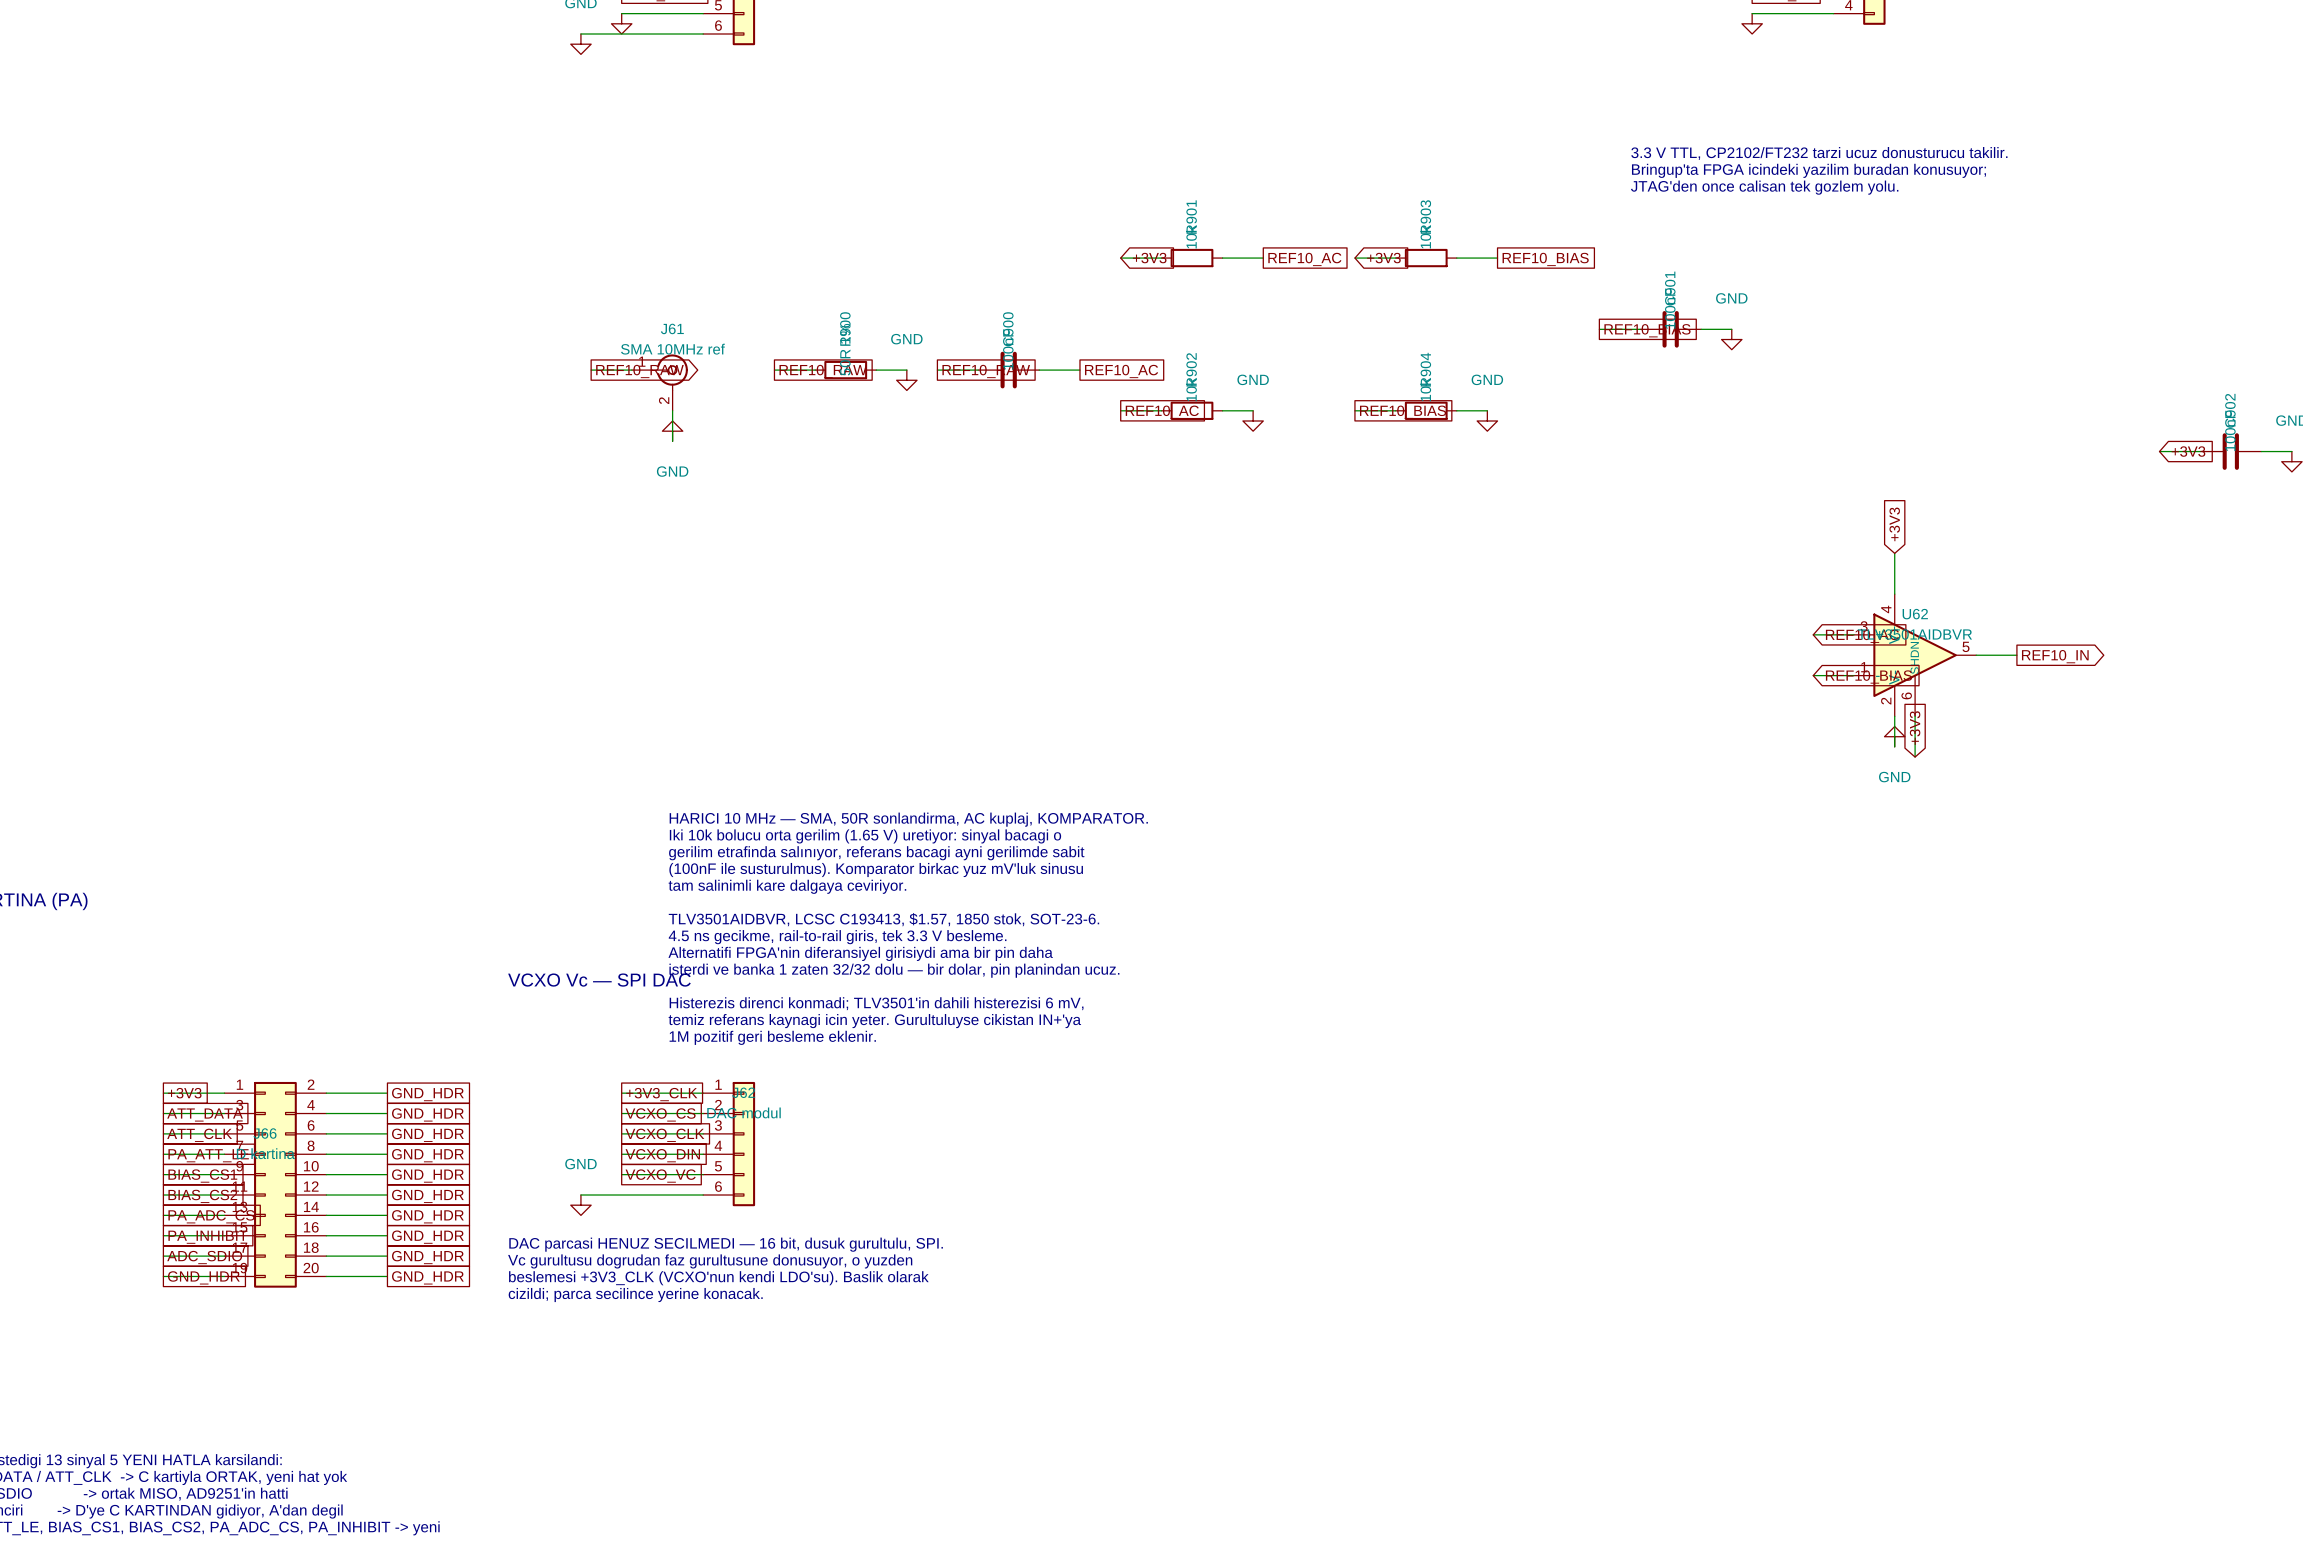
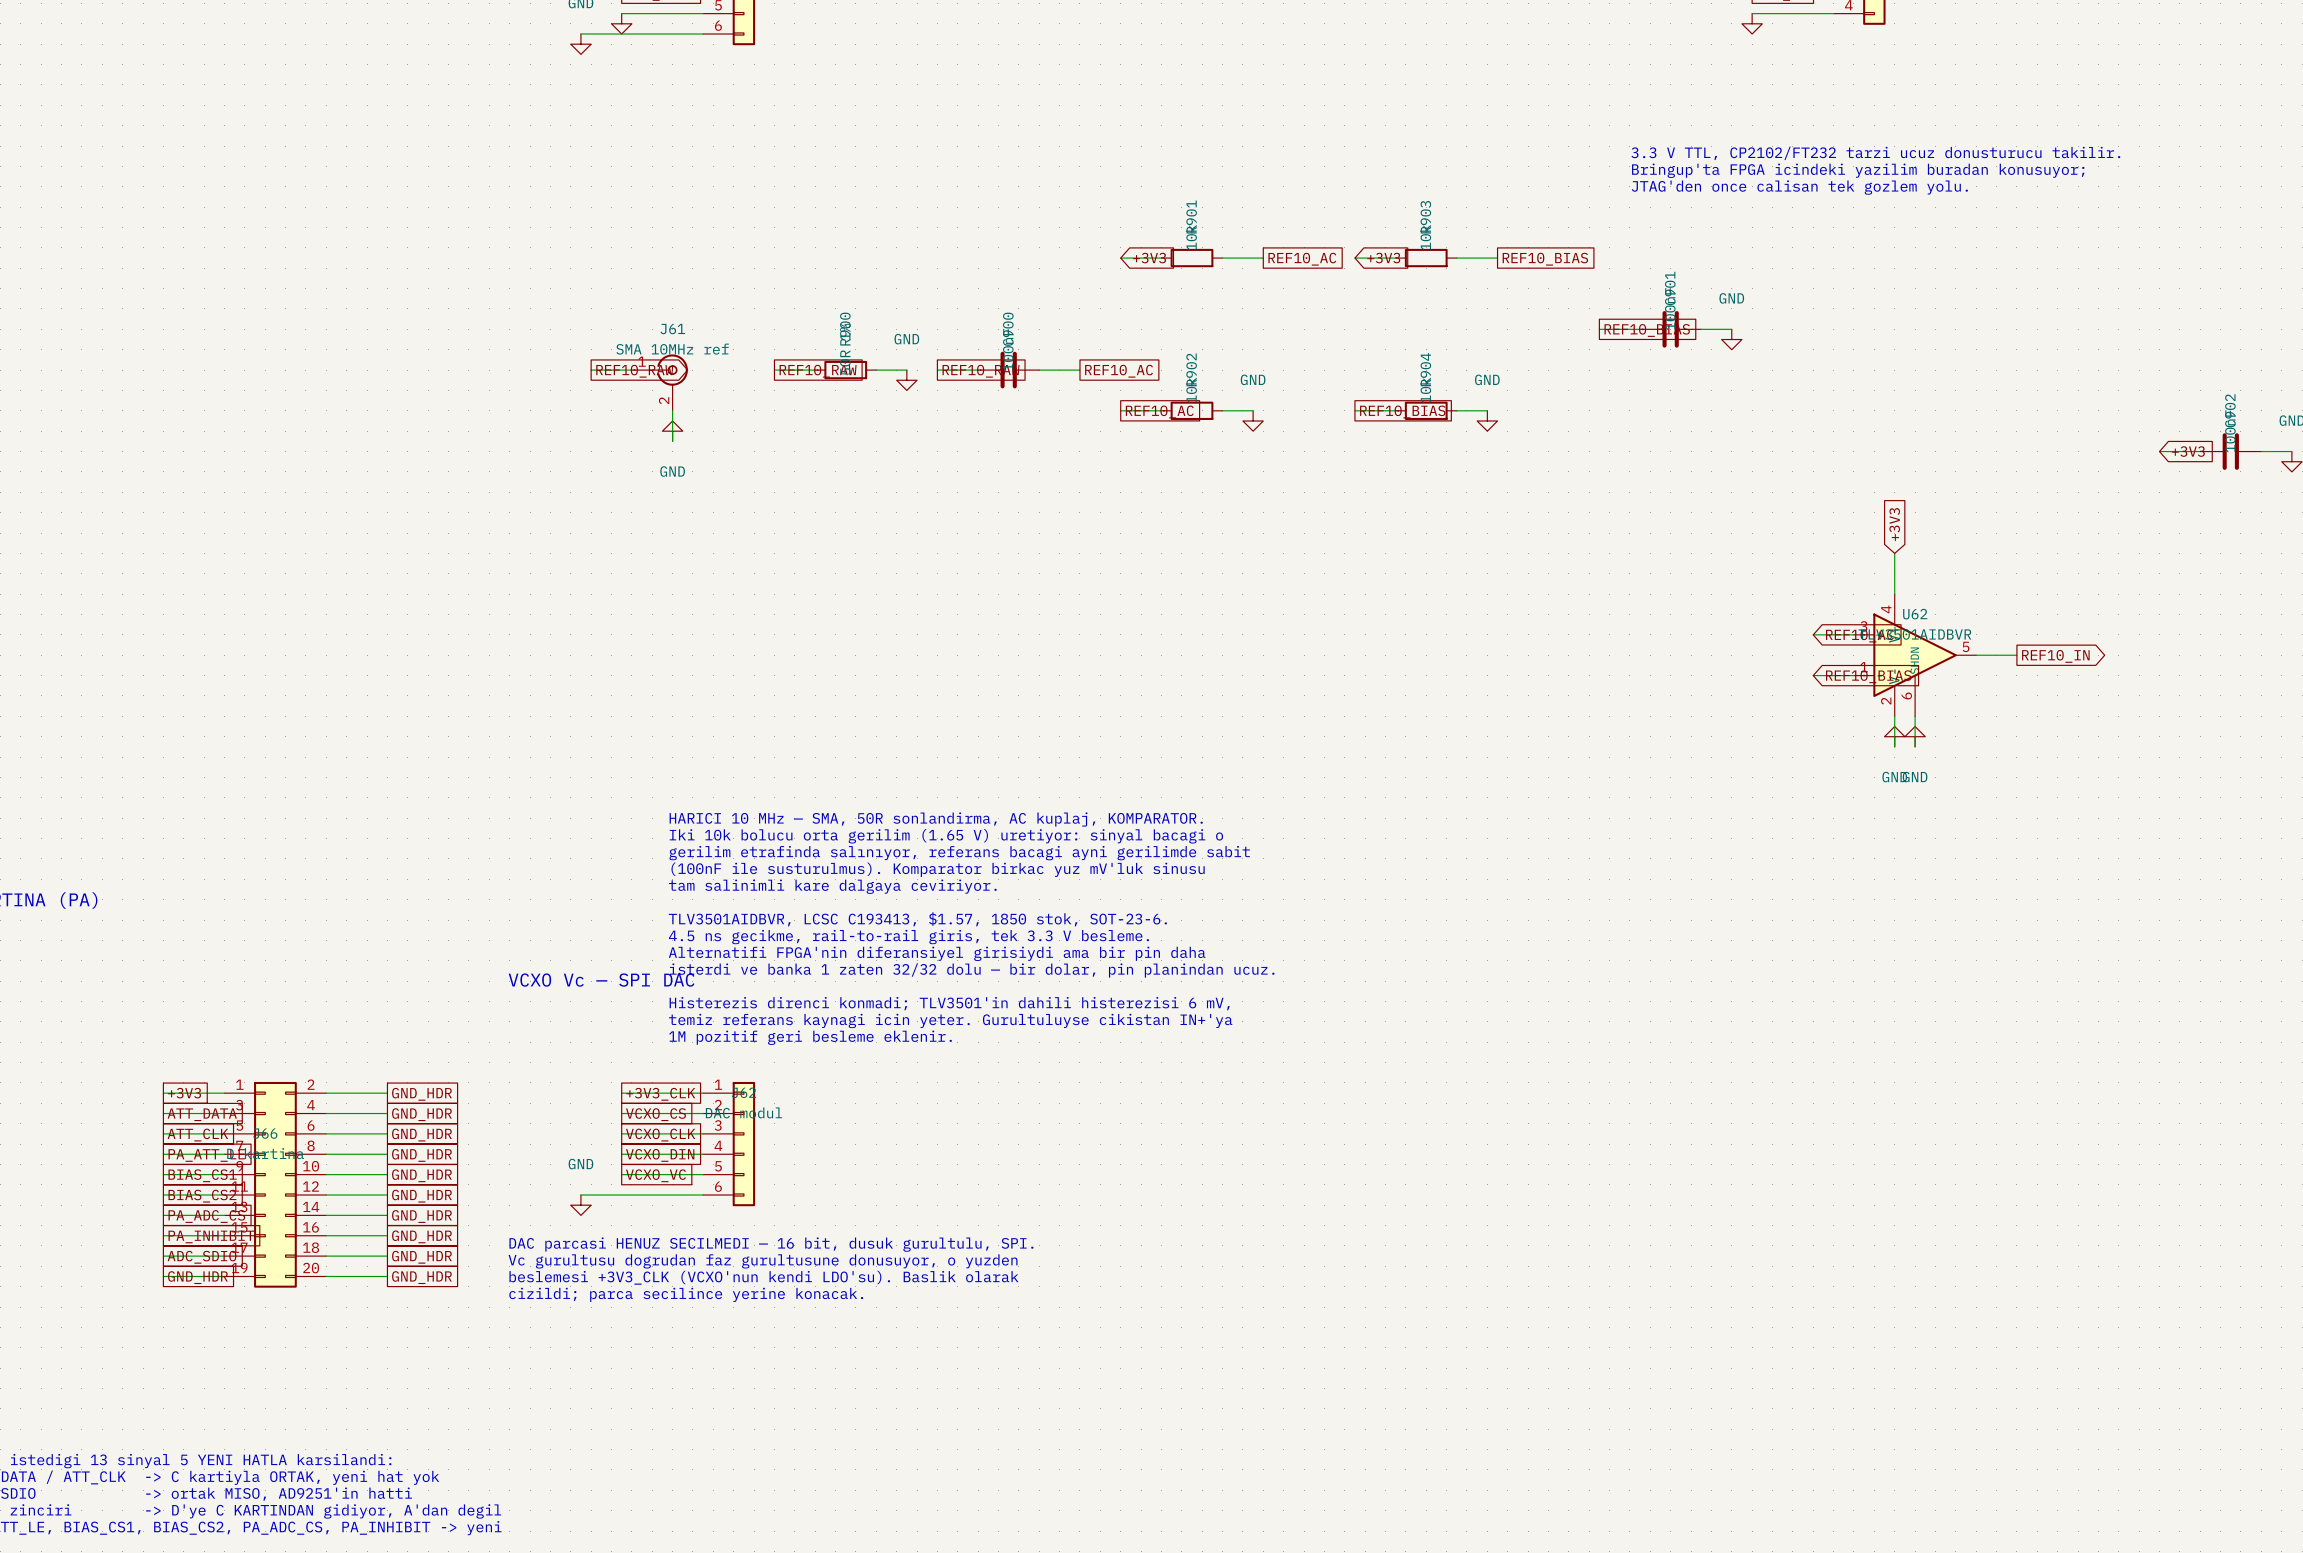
global label: +3V3 (1915, 728) -> none
power symbol: none -> GND (1915, 736)
wire: (1915, 746) (1915, 757) -> none

